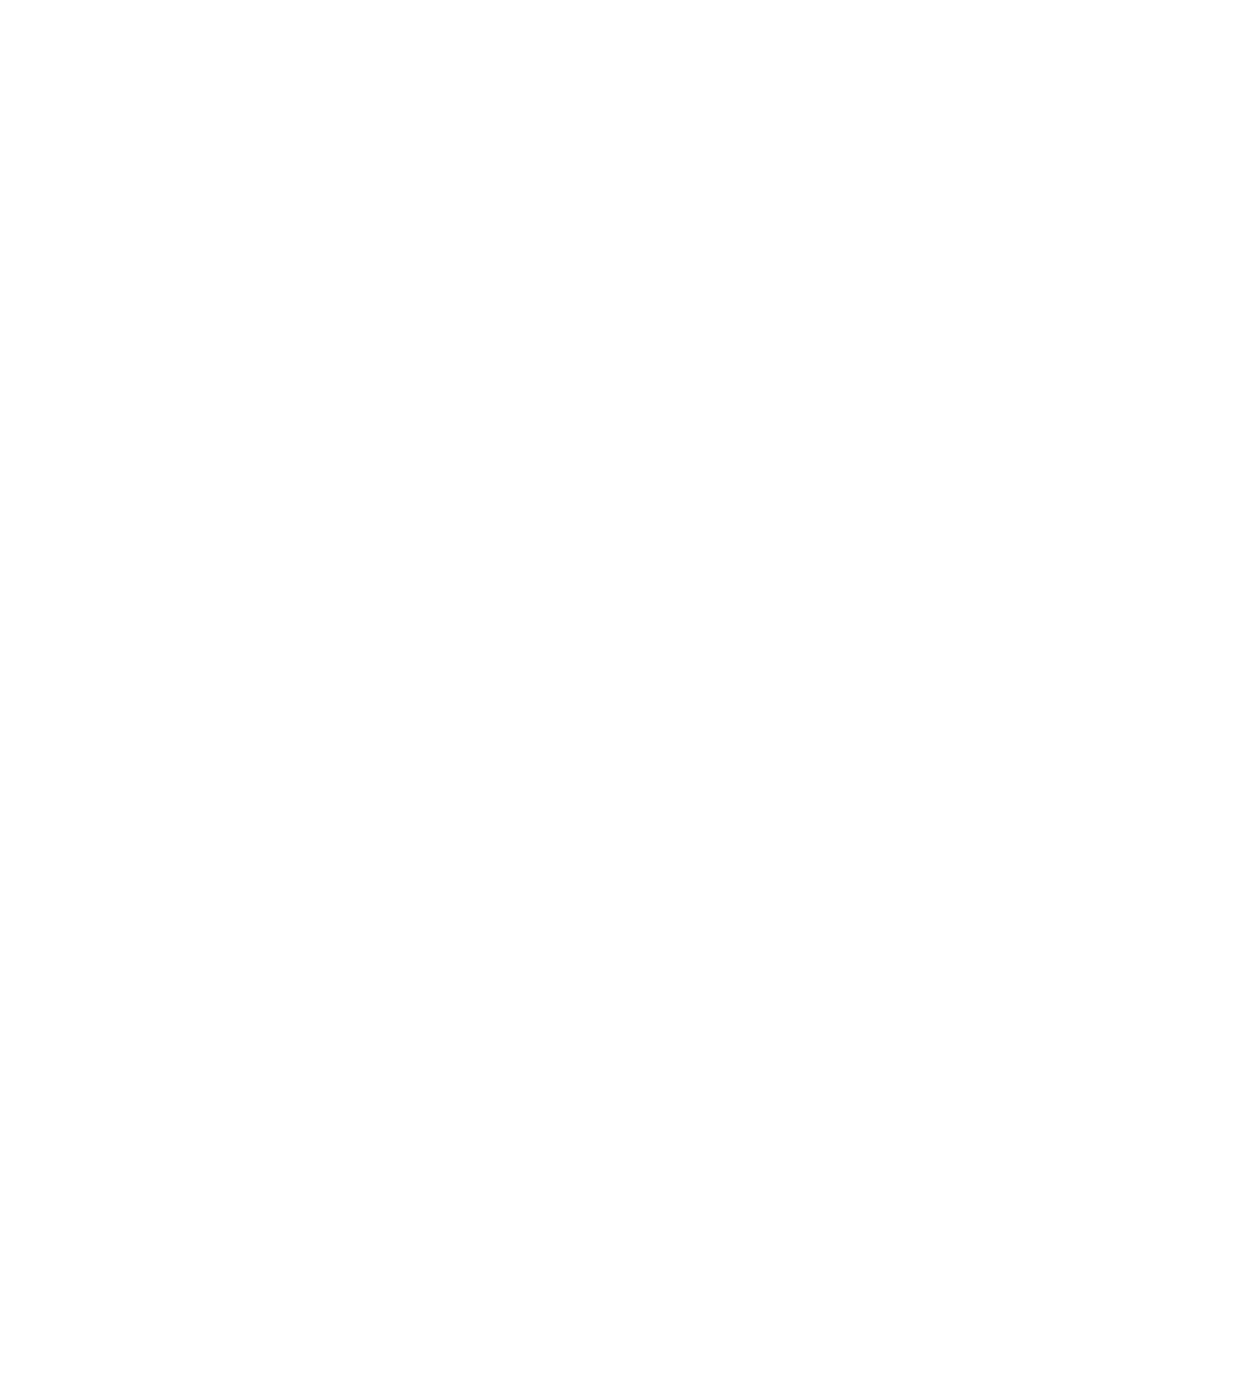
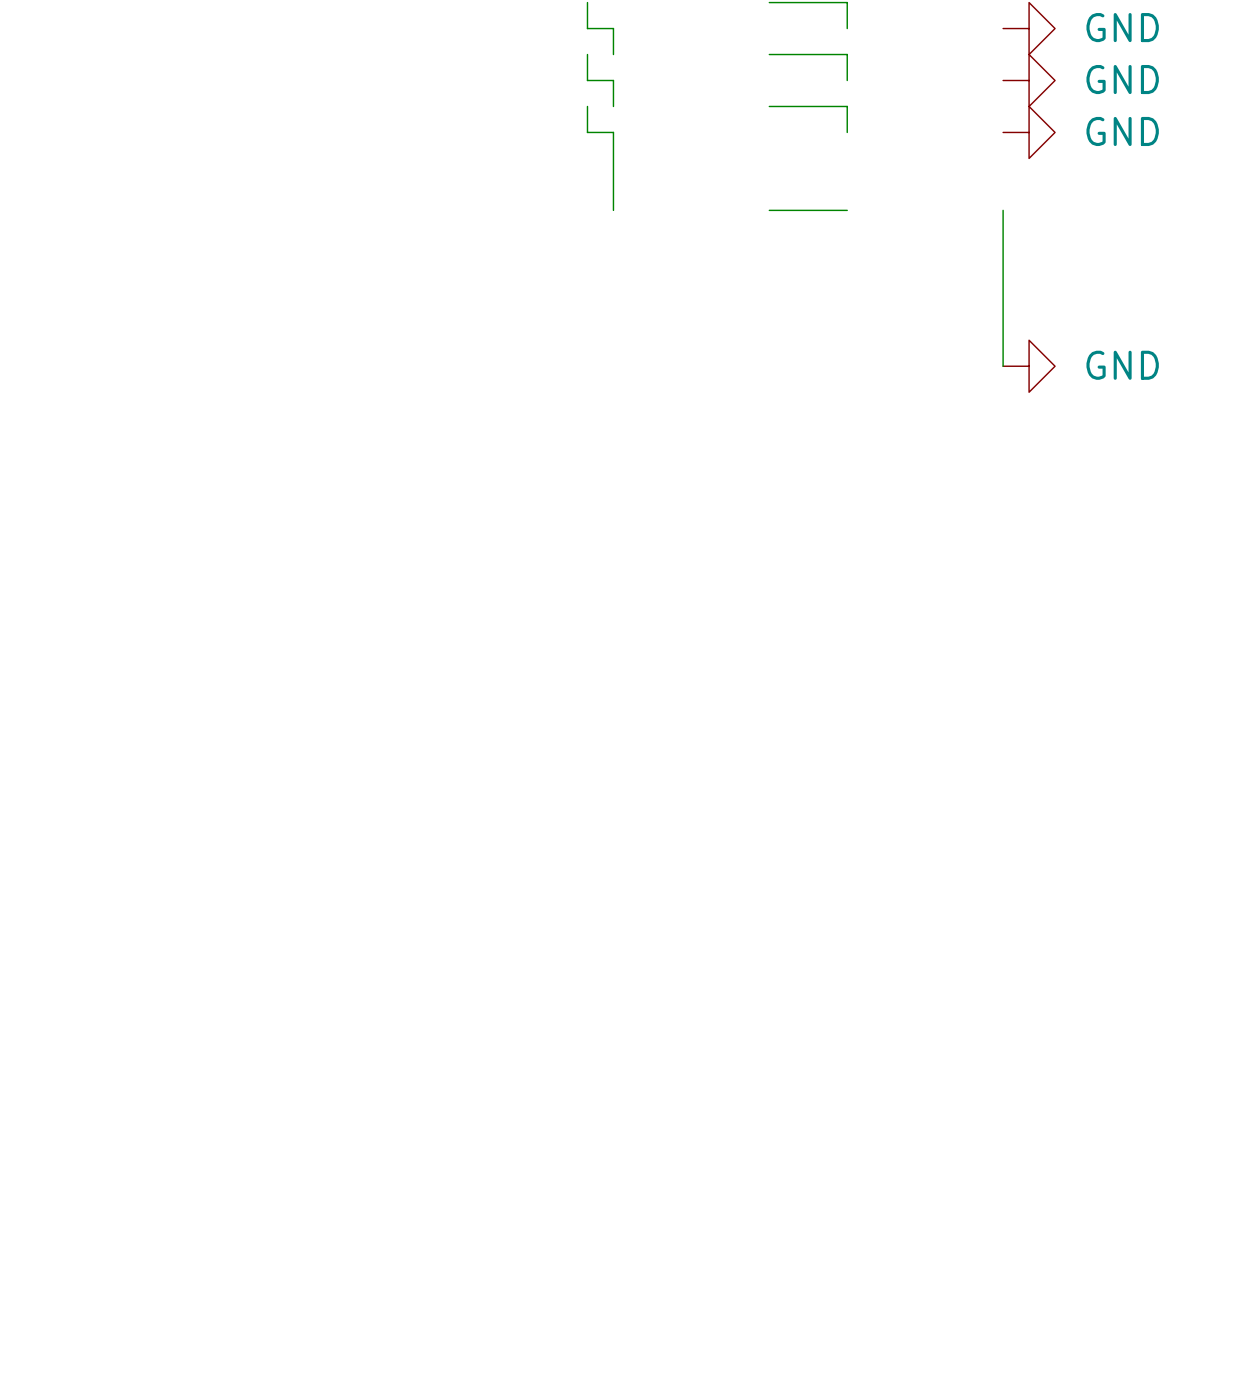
wire: none -> (587, 2) (587, 28) (613, 28) (613, 54)
wire: none -> (769, 2) (847, 2) (847, 28)
power symbol: none -> GND (1029, 28)
wire: none -> (587, 54) (587, 80) (613, 80) (613, 106)
wire: none -> (769, 54) (847, 54) (847, 80)
power symbol: none -> GND (1029, 80)
wire: none -> (587, 106) (587, 132) (613, 132) (613, 210)
wire: none -> (769, 106) (847, 106) (847, 132)
power symbol: none -> GND (1029, 132)
wire: none -> (769, 210) (847, 210)
wire: none -> (1003, 210) (1003, 366)
power symbol: none -> GND (1029, 366)

